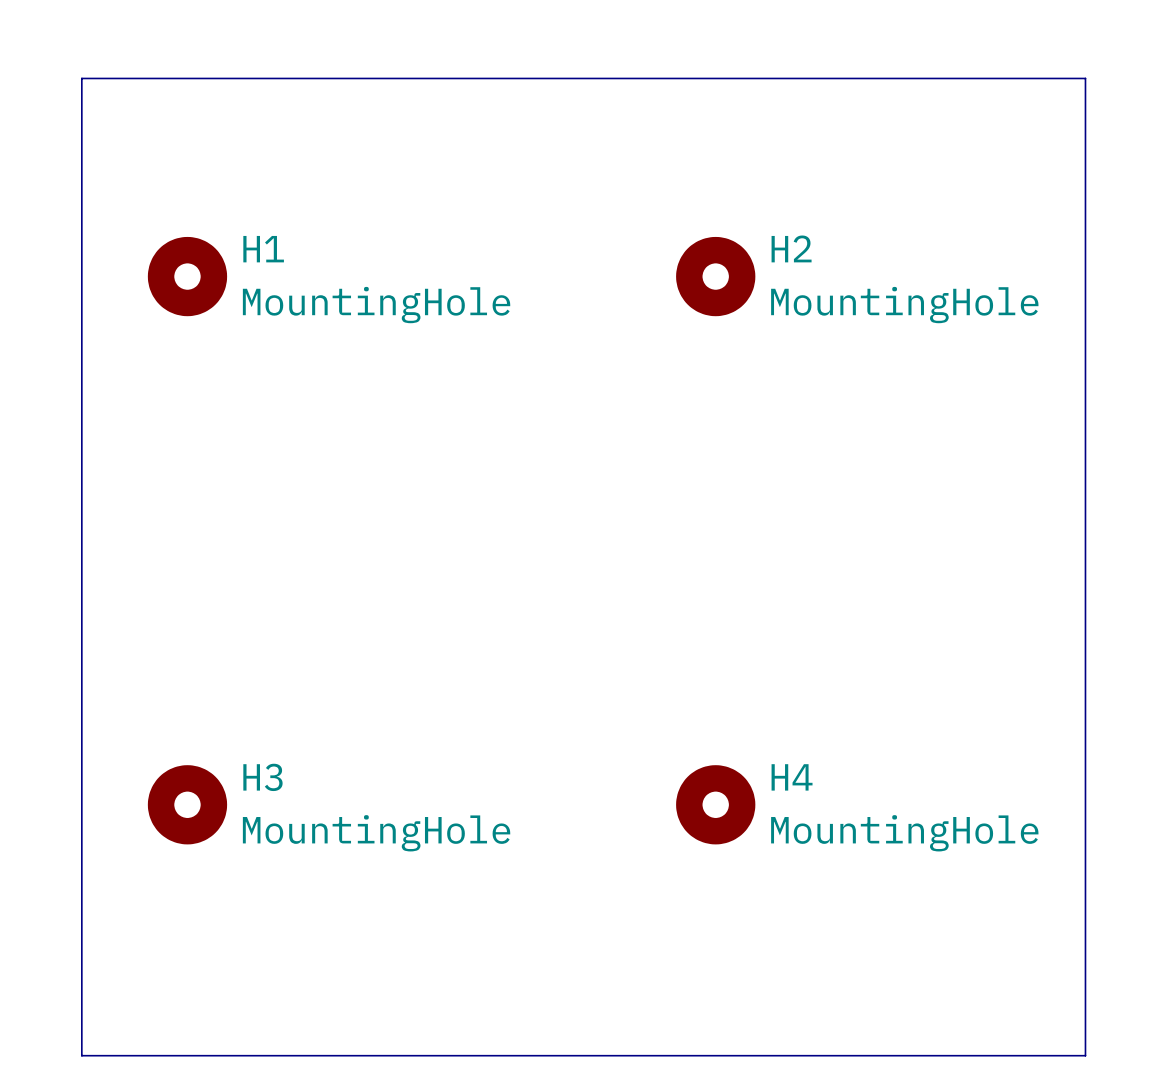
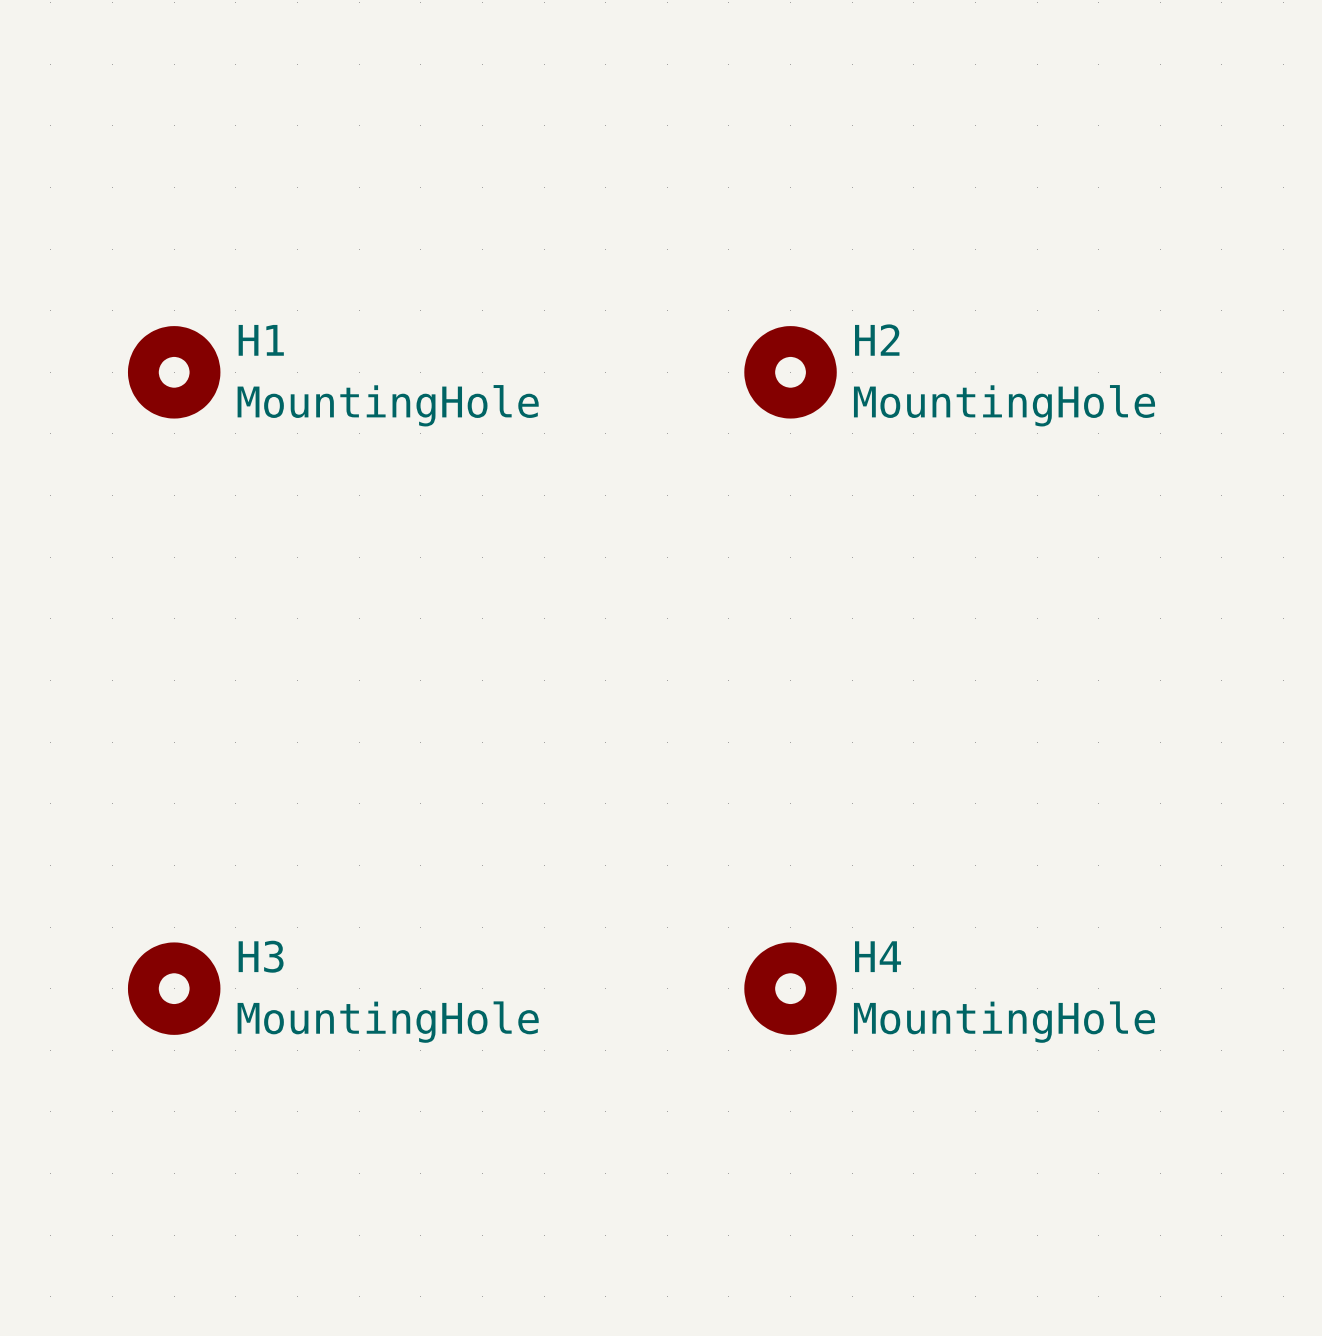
line: (81, 78) (1085, 78) (1085, 1055) (81, 1055) (81, 78) -> none

